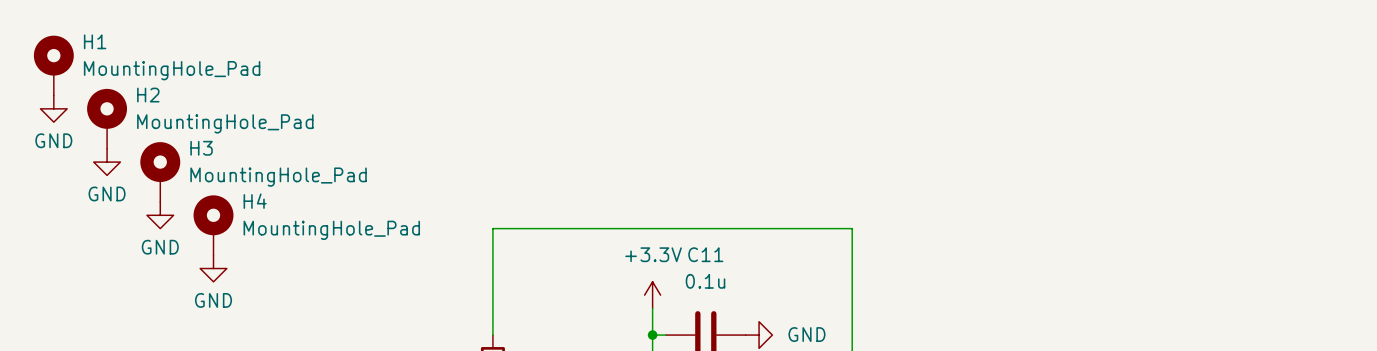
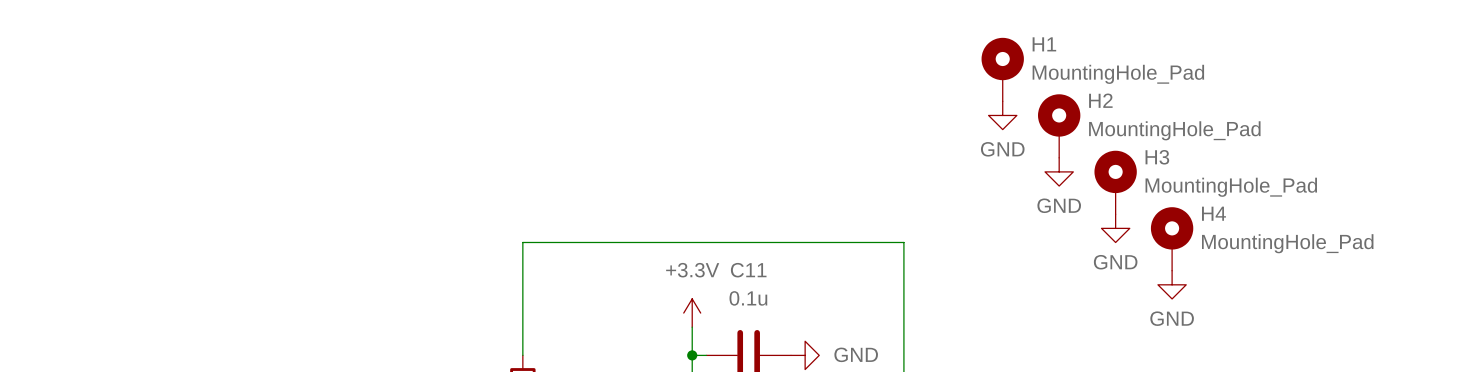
H1 position: (53, 65) -> (1002, 69)
power symbol: GND (53, 108) -> none
power symbol: none -> GND (1002, 115)
H2 position: (107, 118) -> (1059, 126)
power symbol: GND (107, 162) -> none
power symbol: none -> GND (1059, 171)
H3 position: (160, 172) -> (1115, 182)
power symbol: GND (160, 215) -> none
power symbol: none -> GND (1115, 228)
H4 position: (213, 225) -> (1172, 238)
power symbol: GND (213, 268) -> none
power symbol: none -> GND (1172, 284)

